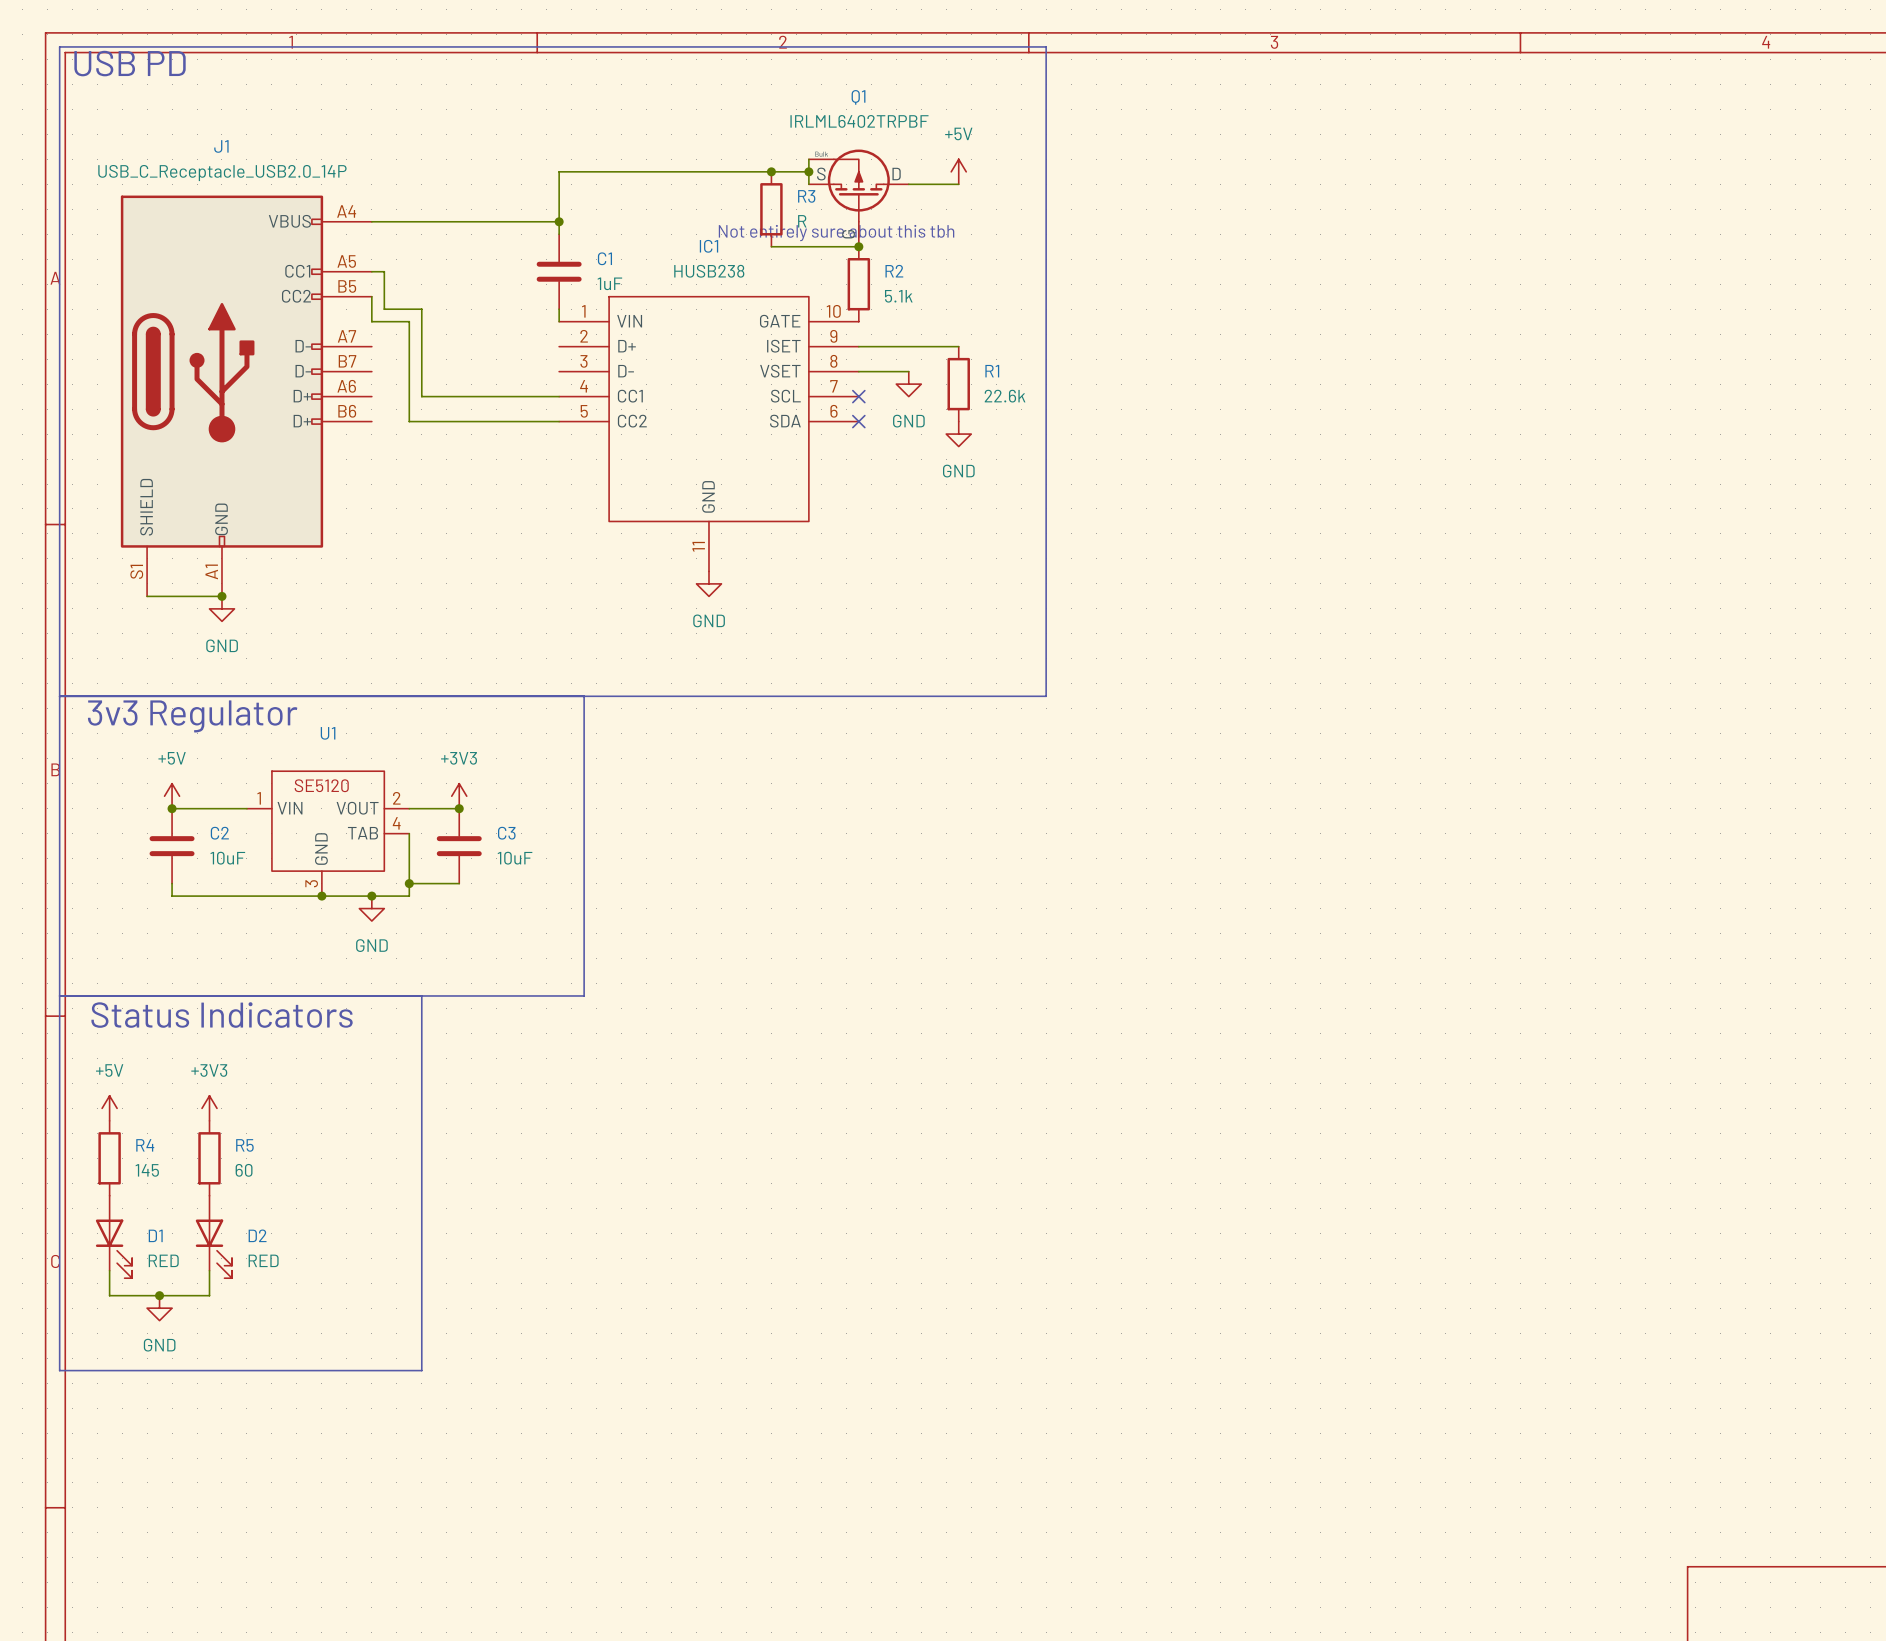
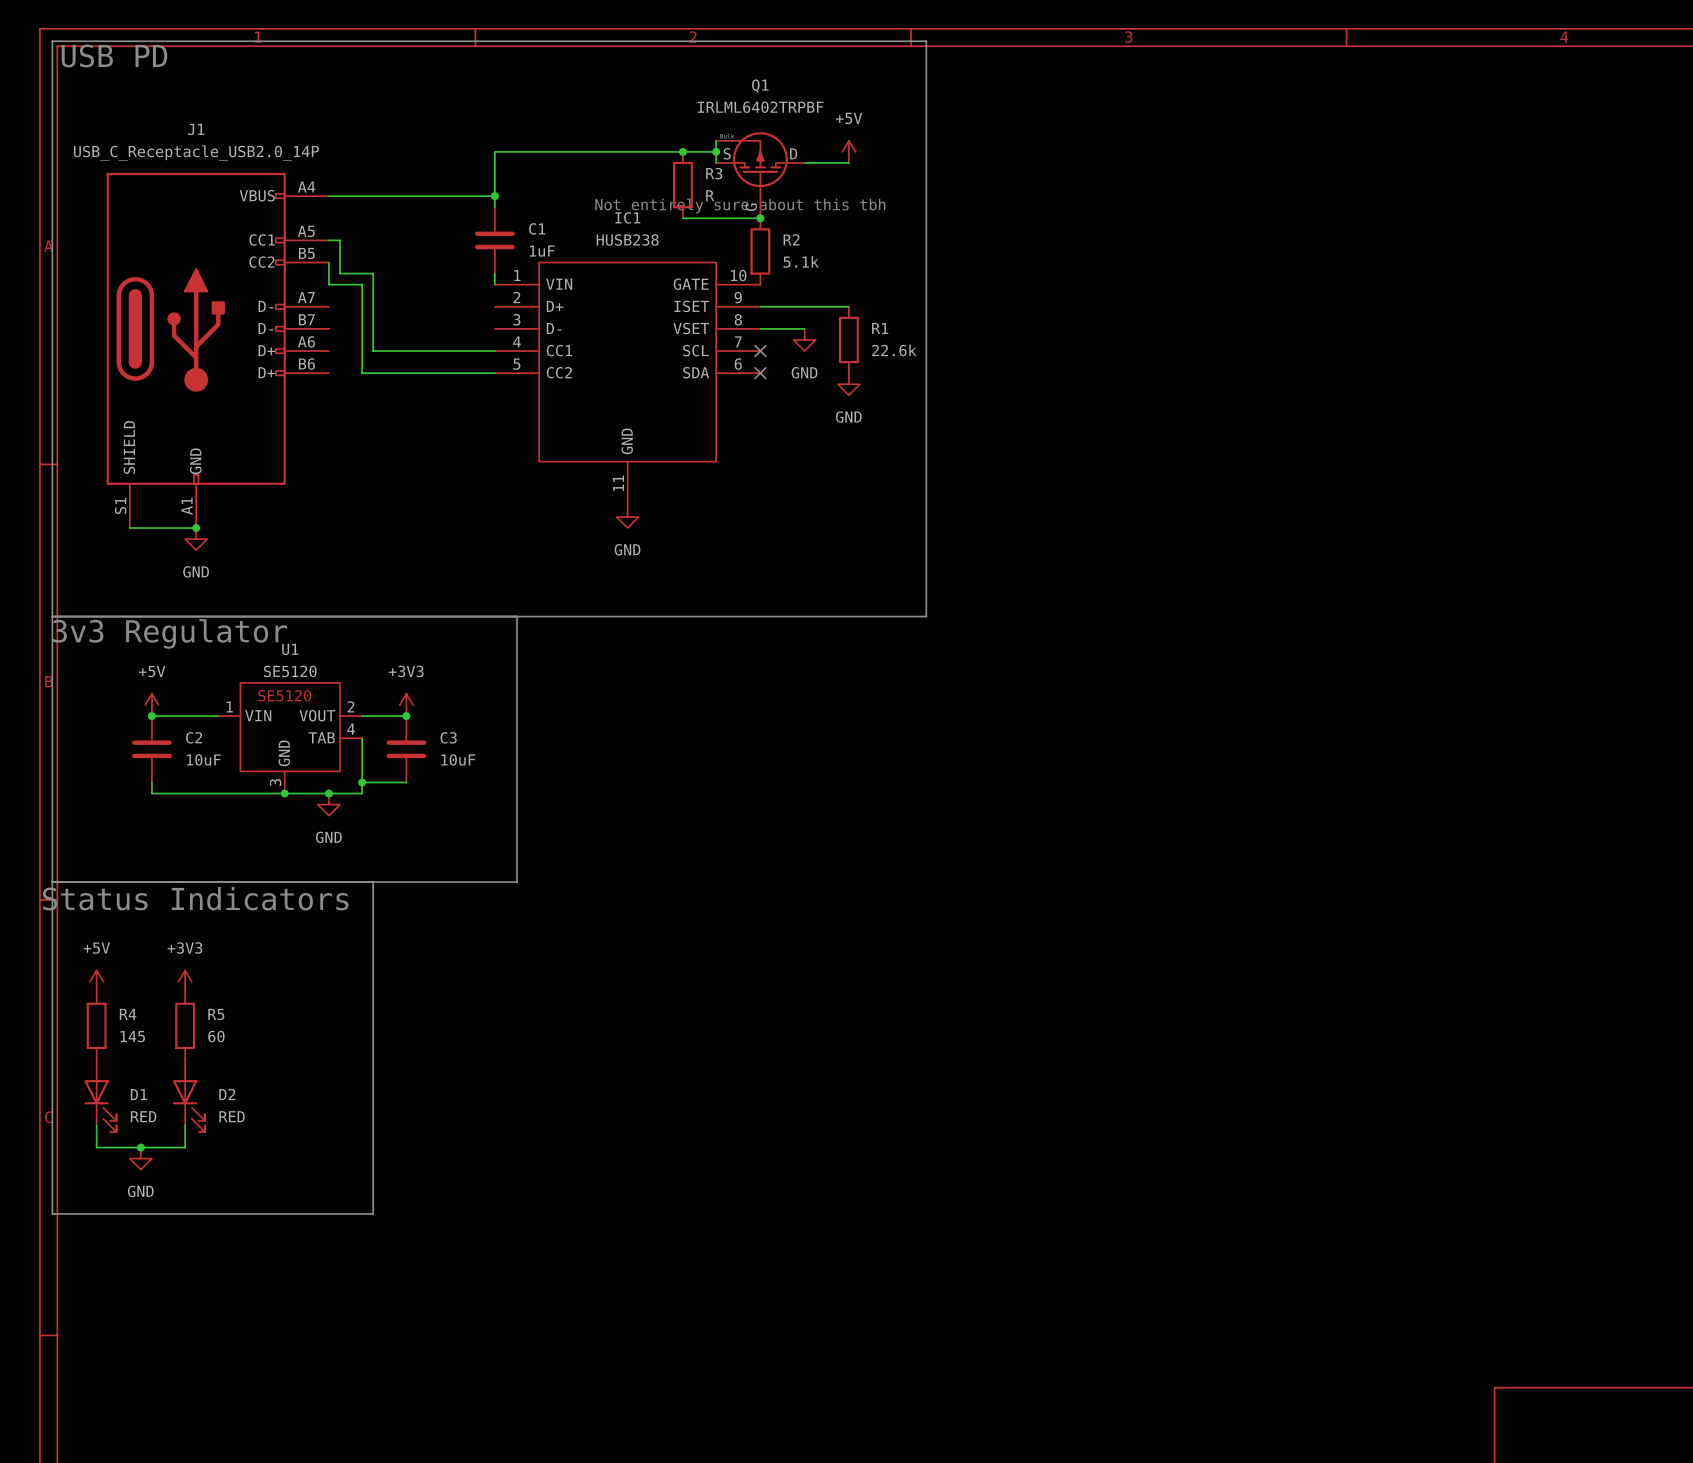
U1 value: none -> SE5120 (290, 671)

